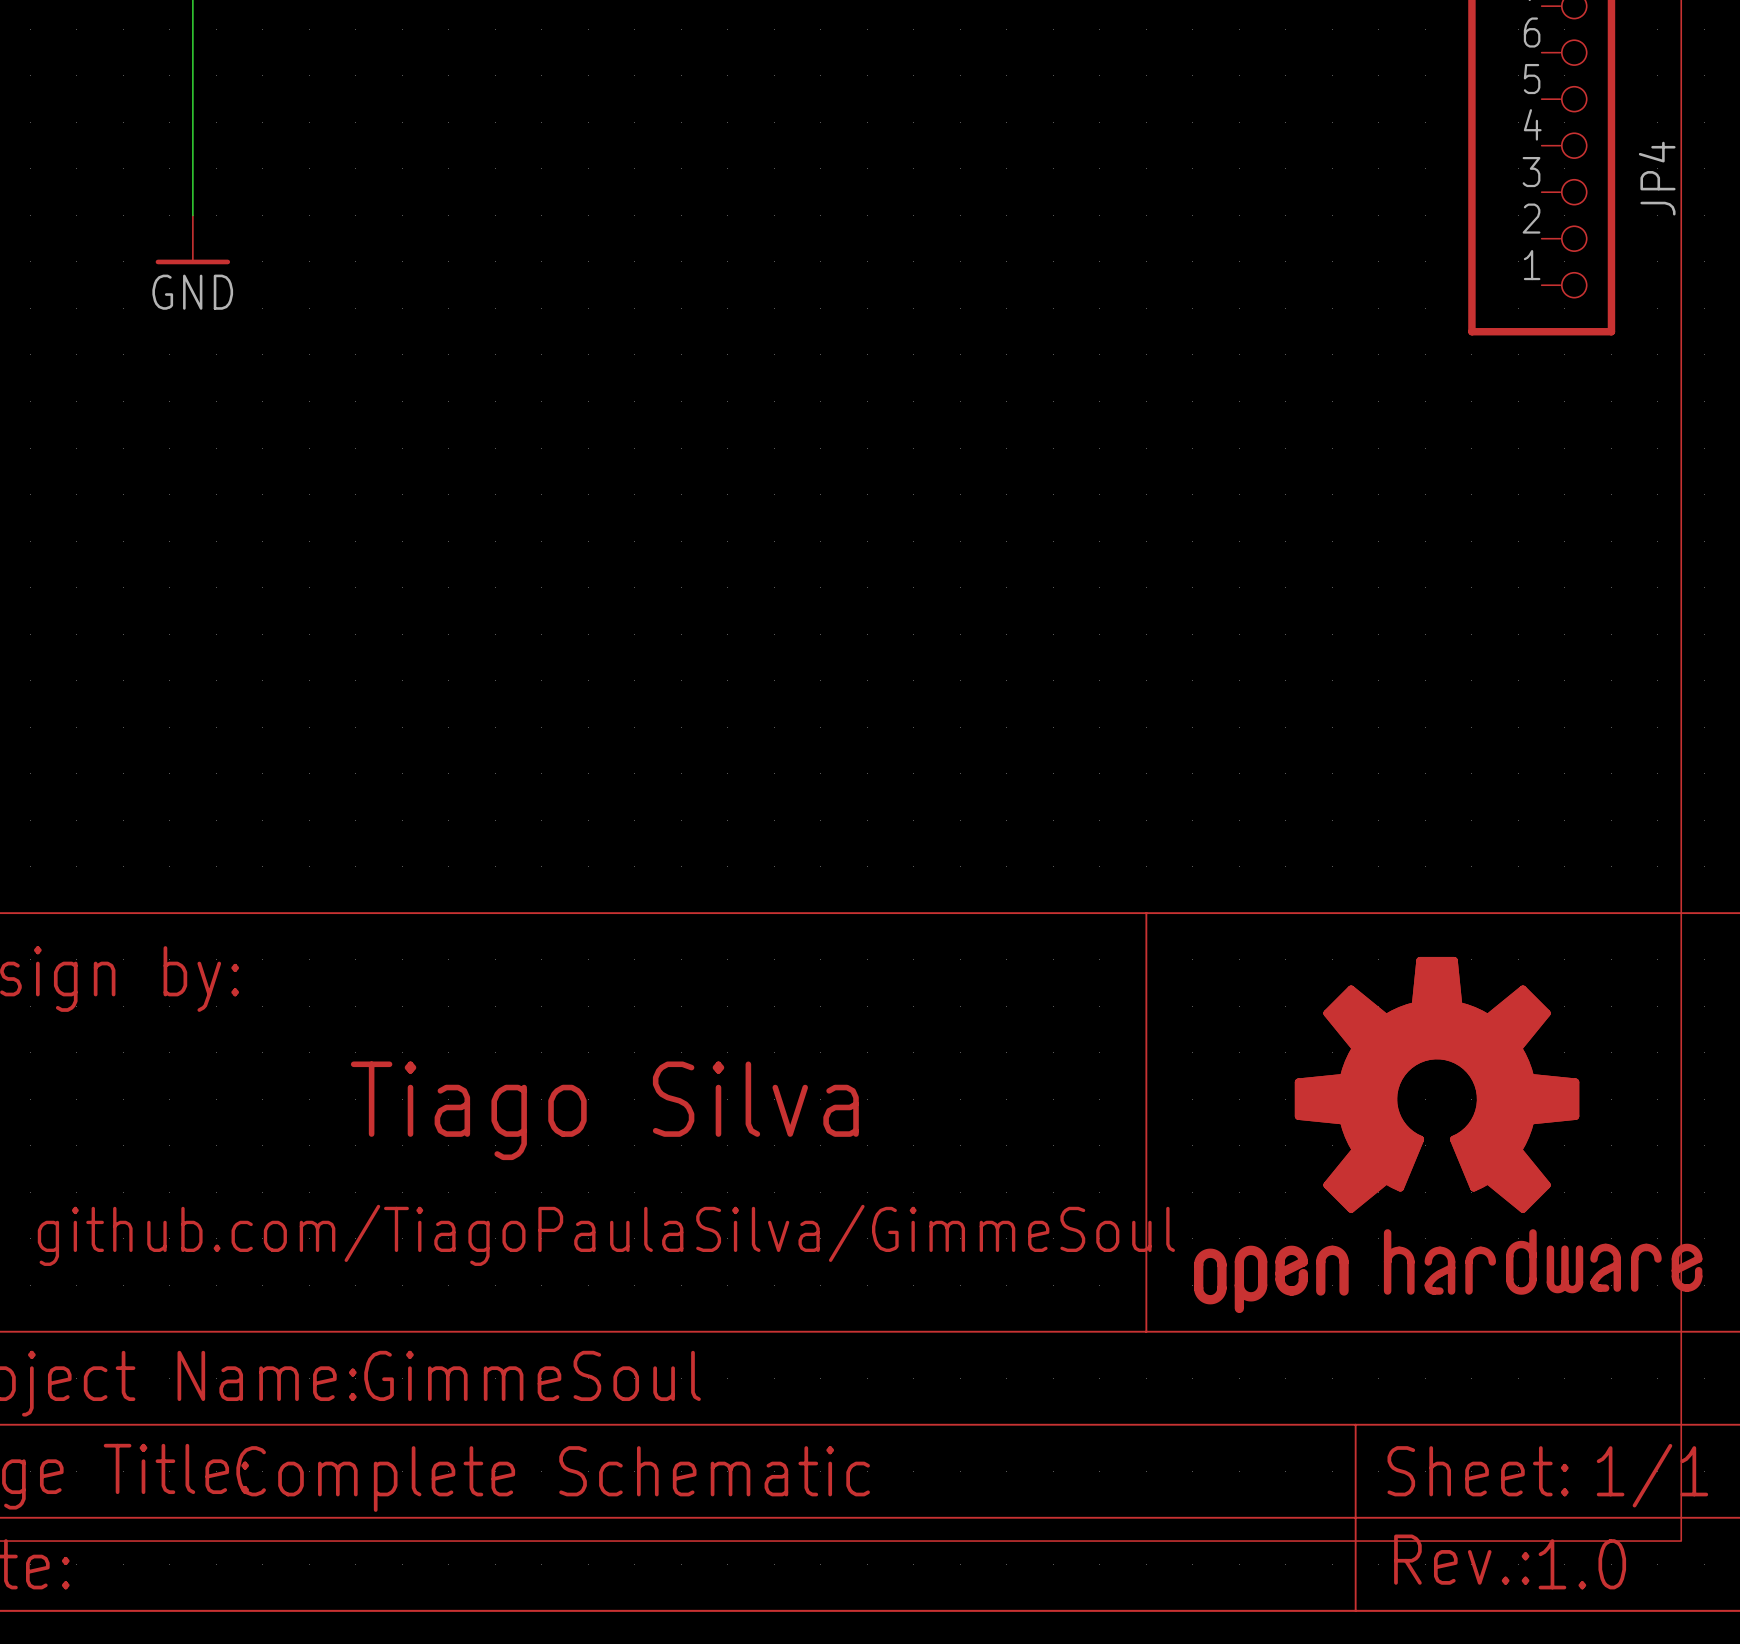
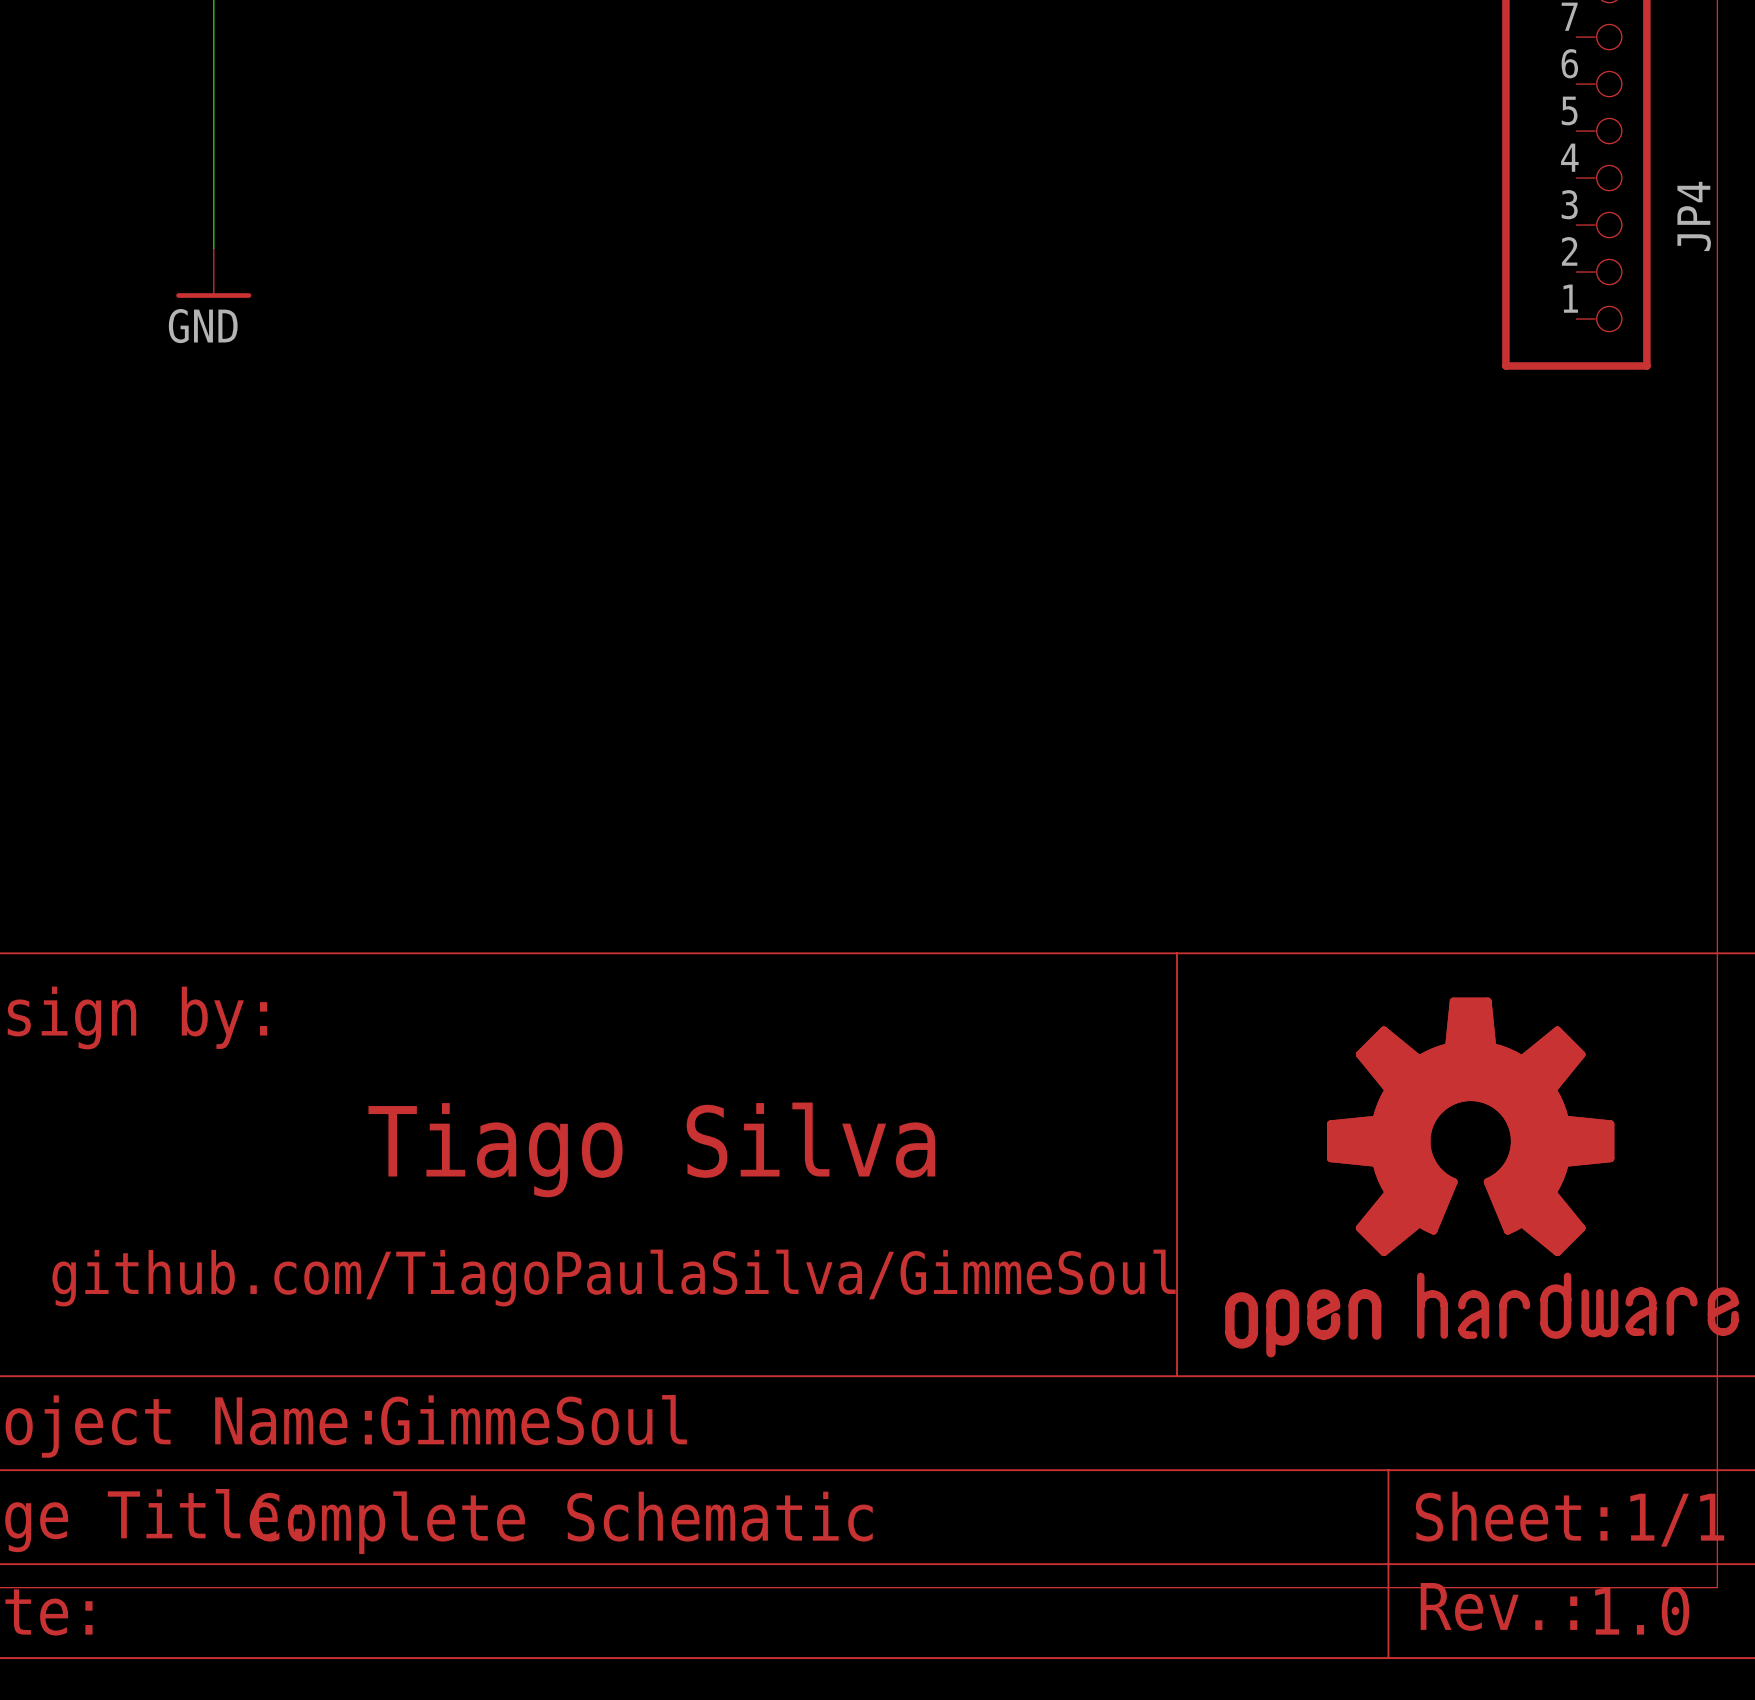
text position: 1.0 (1582, 1564) -> 1.0 (1642, 1611)

